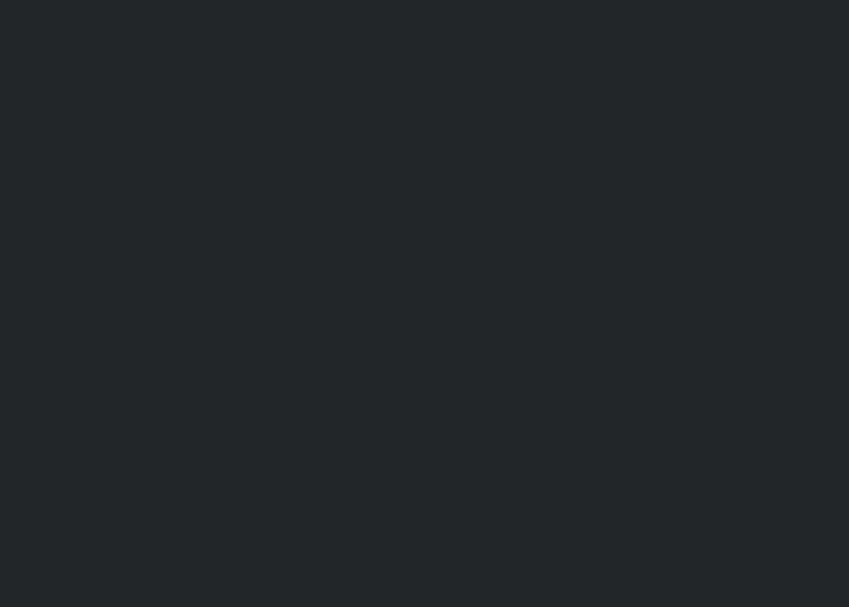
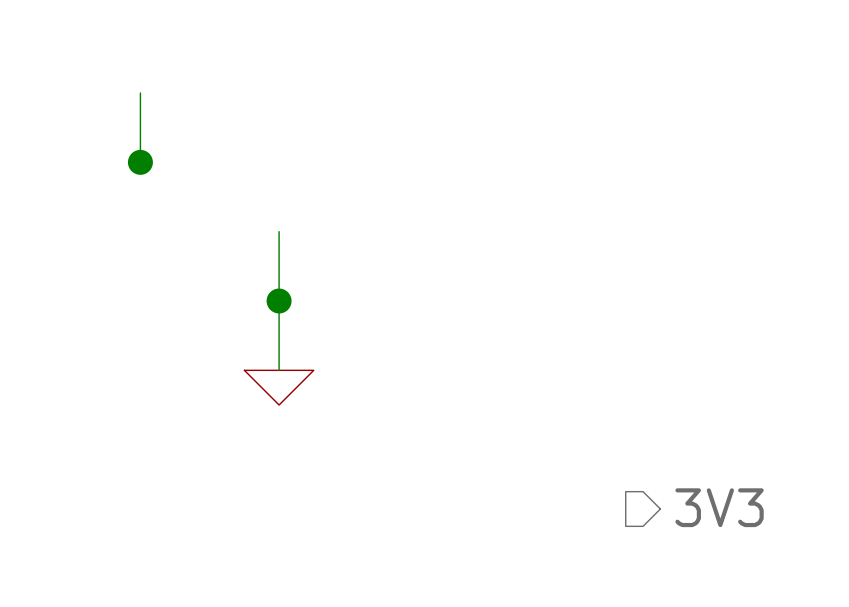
wire: none -> (140, 93) (140, 162)
junction: none -> (140, 162)
wire: none -> (279, 231) (279, 370)
junction: none -> (279, 301)
power symbol: none -> (279, 387)
hierarchical label: none -> 3V3 (719, 507)

